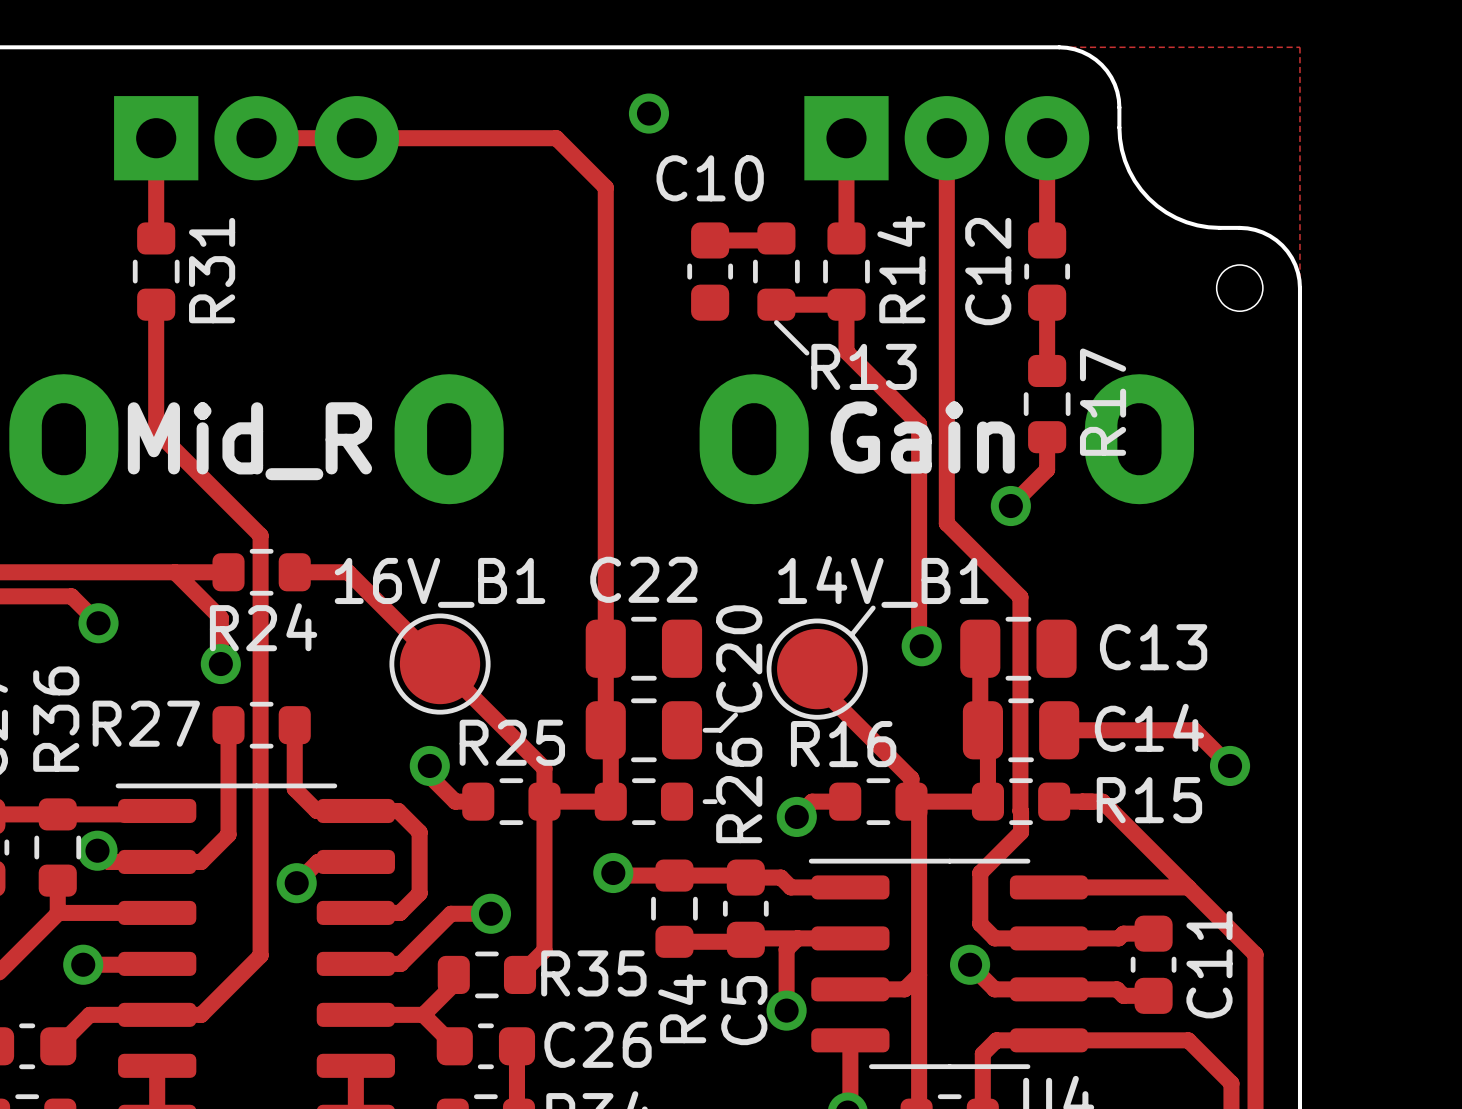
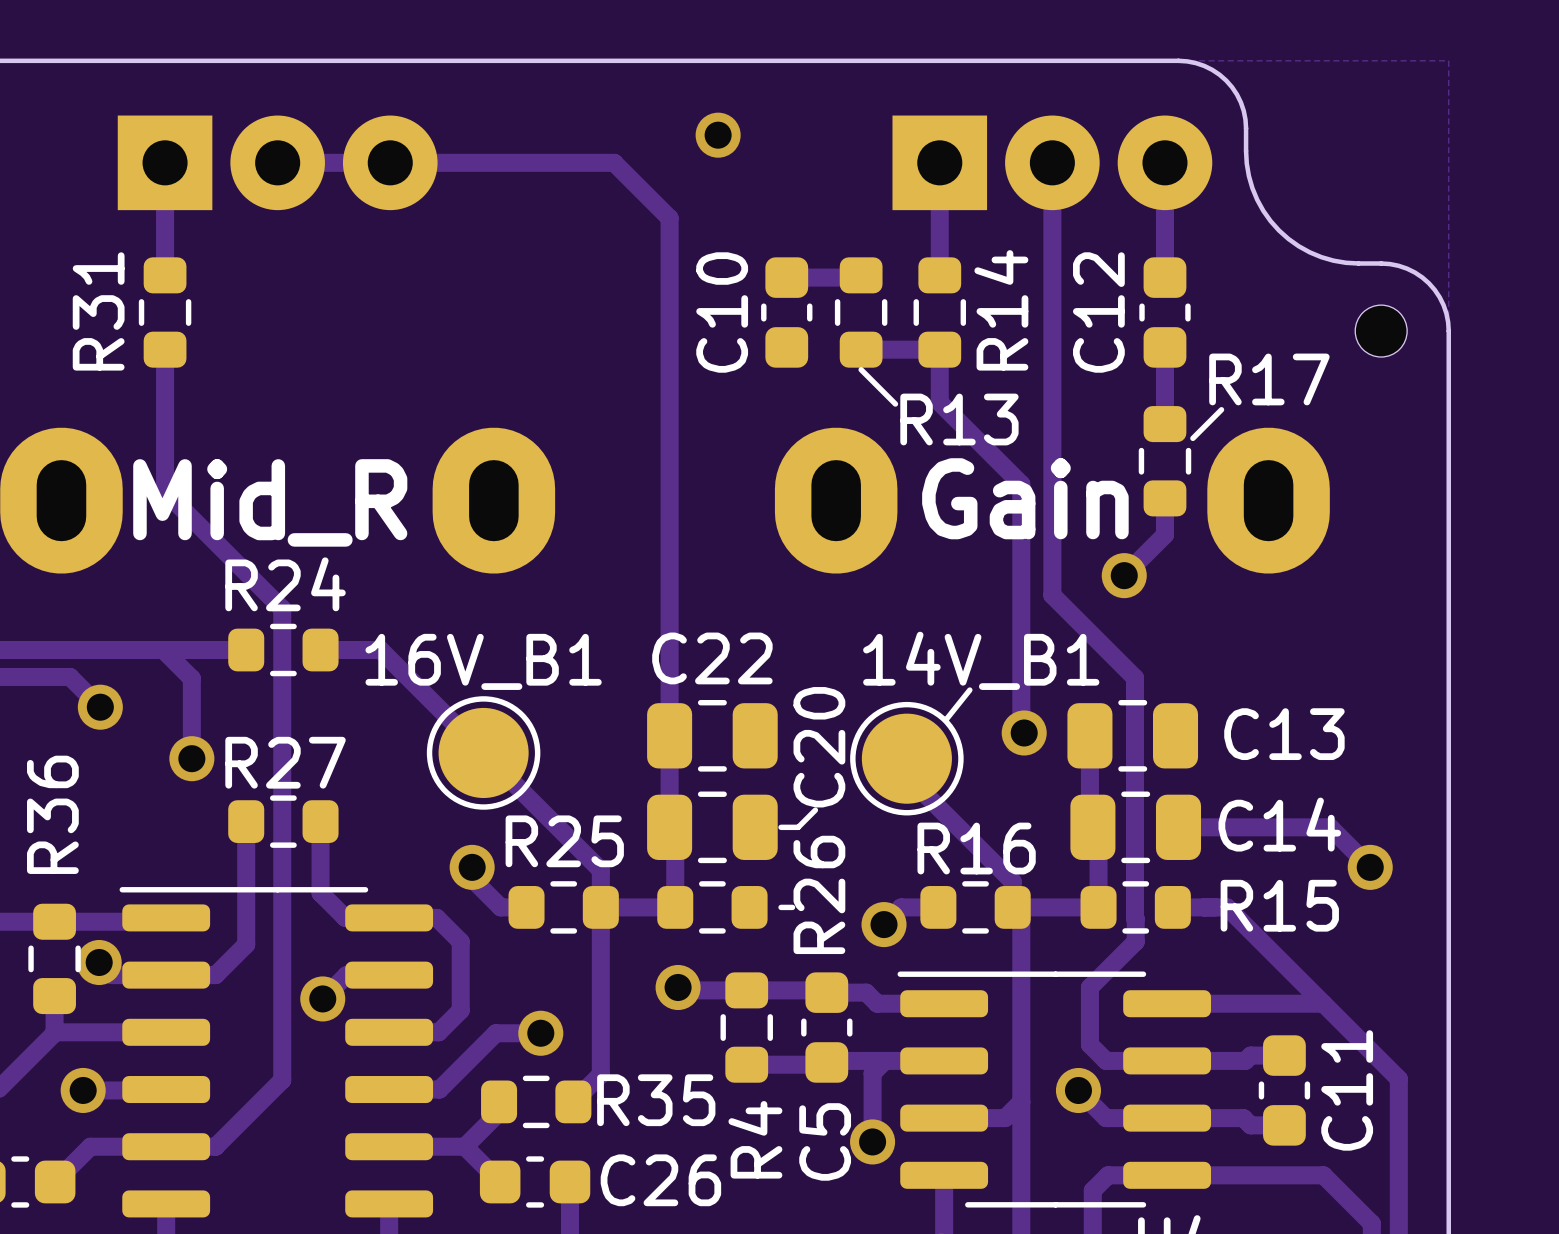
C10 name rotation: 0° (710, 178) -> 90° counterclockwise (722, 312)
R31 name position: R31 (212, 270) -> R31 (98, 311)
line: none -> (1221, 409) (1192, 438)
R17 name rotation: 0° (1103, 402) -> 90° clockwise (1269, 379)
track: none -> (163, 650) (191, 678) (191, 758)
track: (174, 572) (220, 618) (220, 664) -> none
R24 name position: R24 (263, 627) -> R24 (285, 584)
via position: (220, 664) -> (191, 758)
R27 name position: R27 (146, 723) -> R27 (285, 762)
R16 name position: R16 (843, 744) -> R16 (976, 848)

